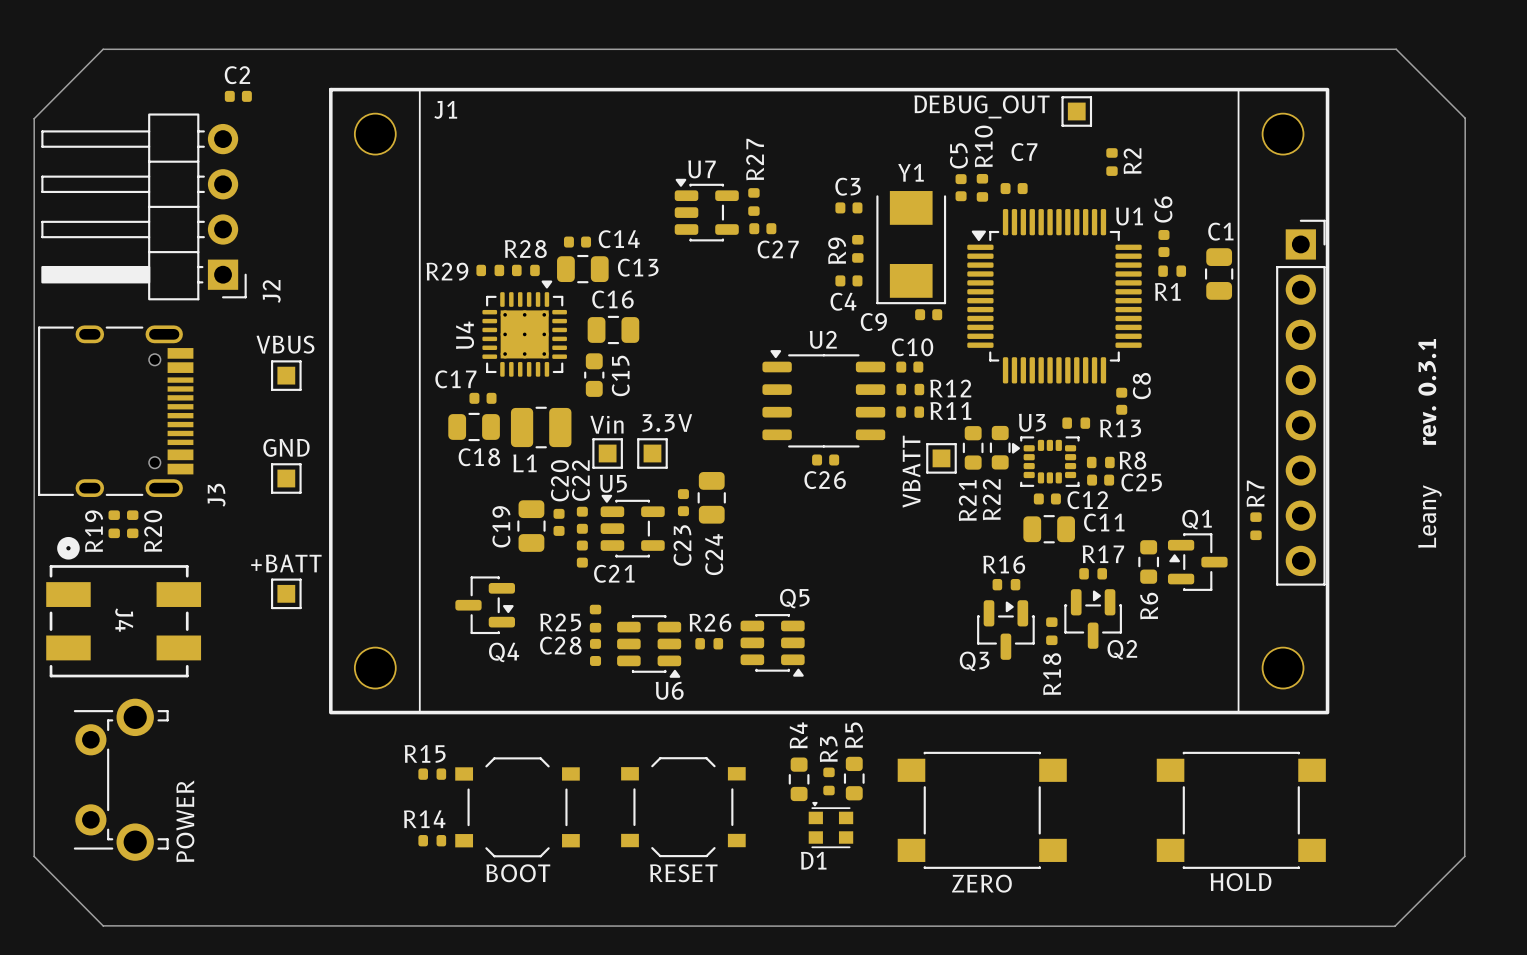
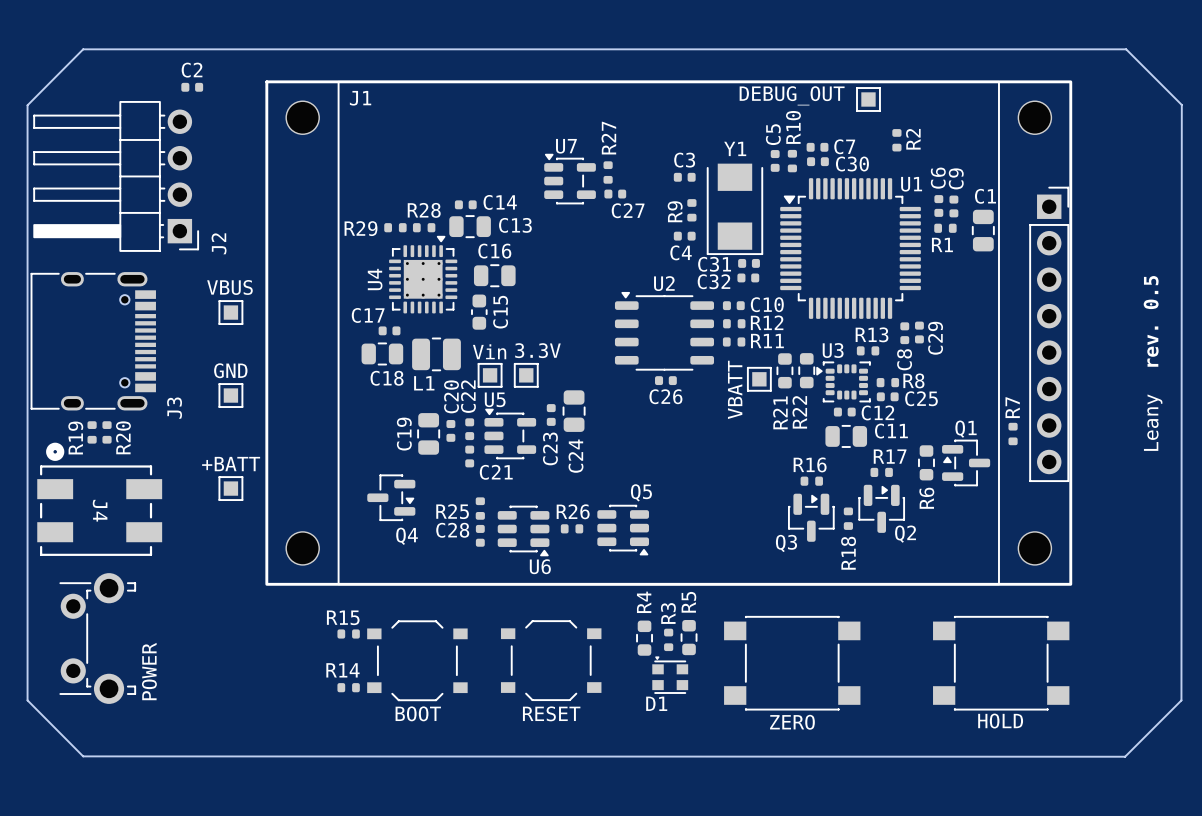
C7 name: C7 (1024, 152) -> C30 (852, 164)
C7: none -> (817, 147)
C9: none -> (953, 206)
C9 name: C9 (873, 322) -> C31 (714, 264)
C32: none -> (748, 277)
C10 name position: C10 (912, 347) -> C10 (767, 304)
C8 name position: C8 (1141, 386) -> C8 (904, 359)
text: rev. 0.3.1 (1427, 391) -> rev. 0.5 (1151, 321)
C29: none -> (919, 332)
R13 name position: R13 (1120, 428) -> R13 (872, 334)

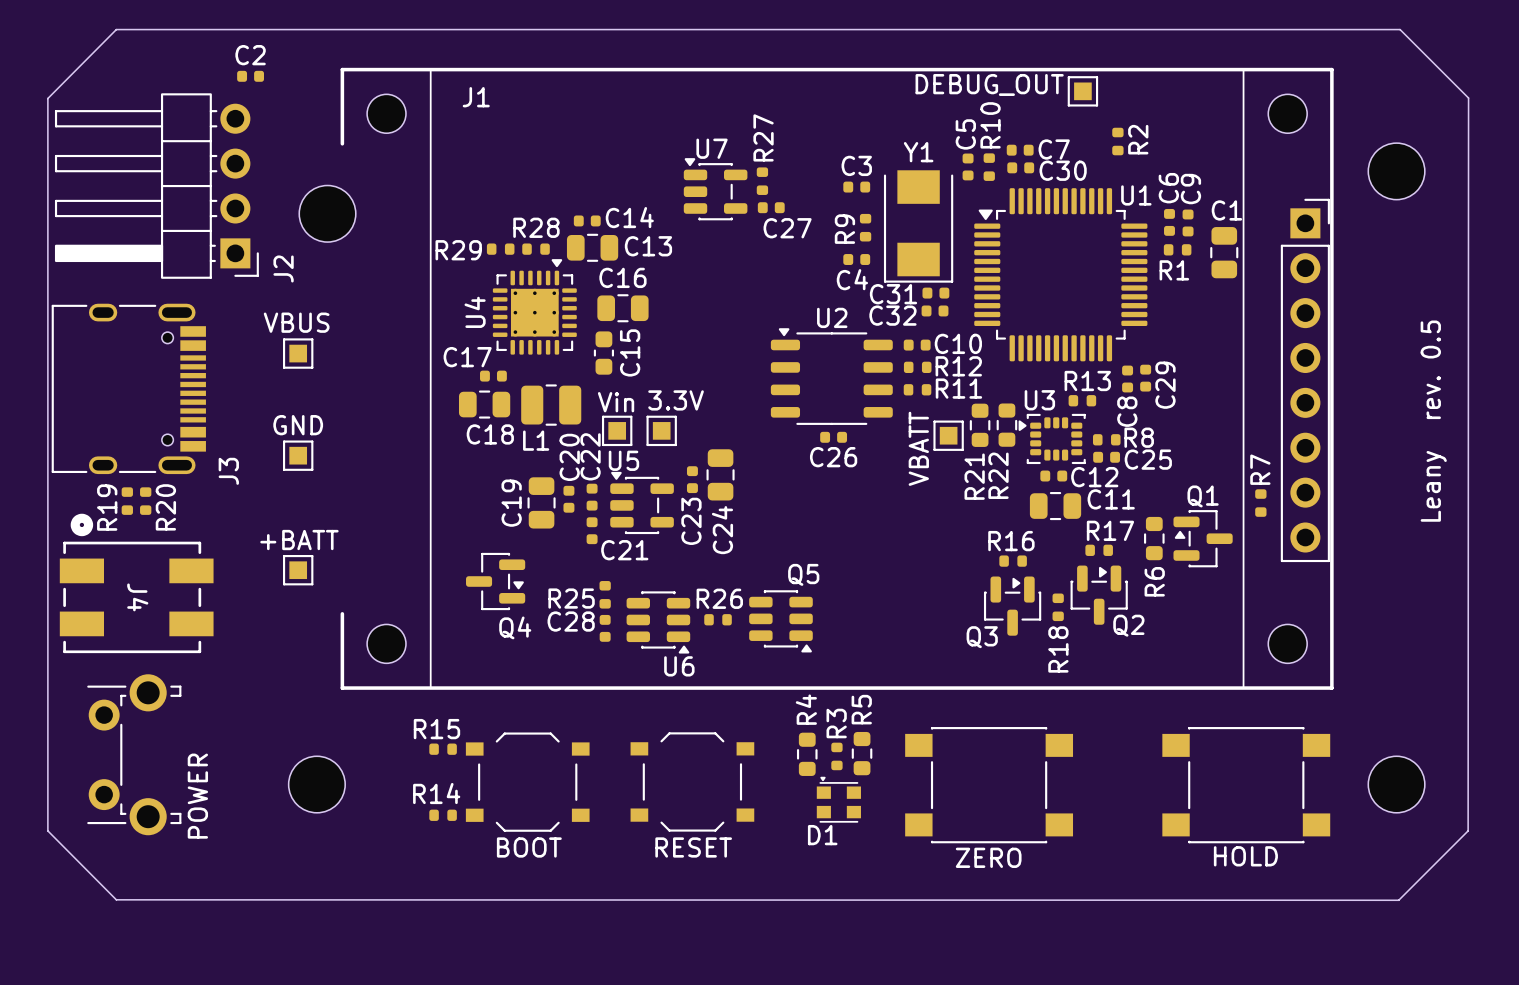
J1 footprint: [265, 80, 1073, 586] -> [340, 67, 1334, 690]
part: none -> (1396, 171)
part: none -> (327, 213)
part: none -> (316, 784)
part: none -> (1396, 784)

